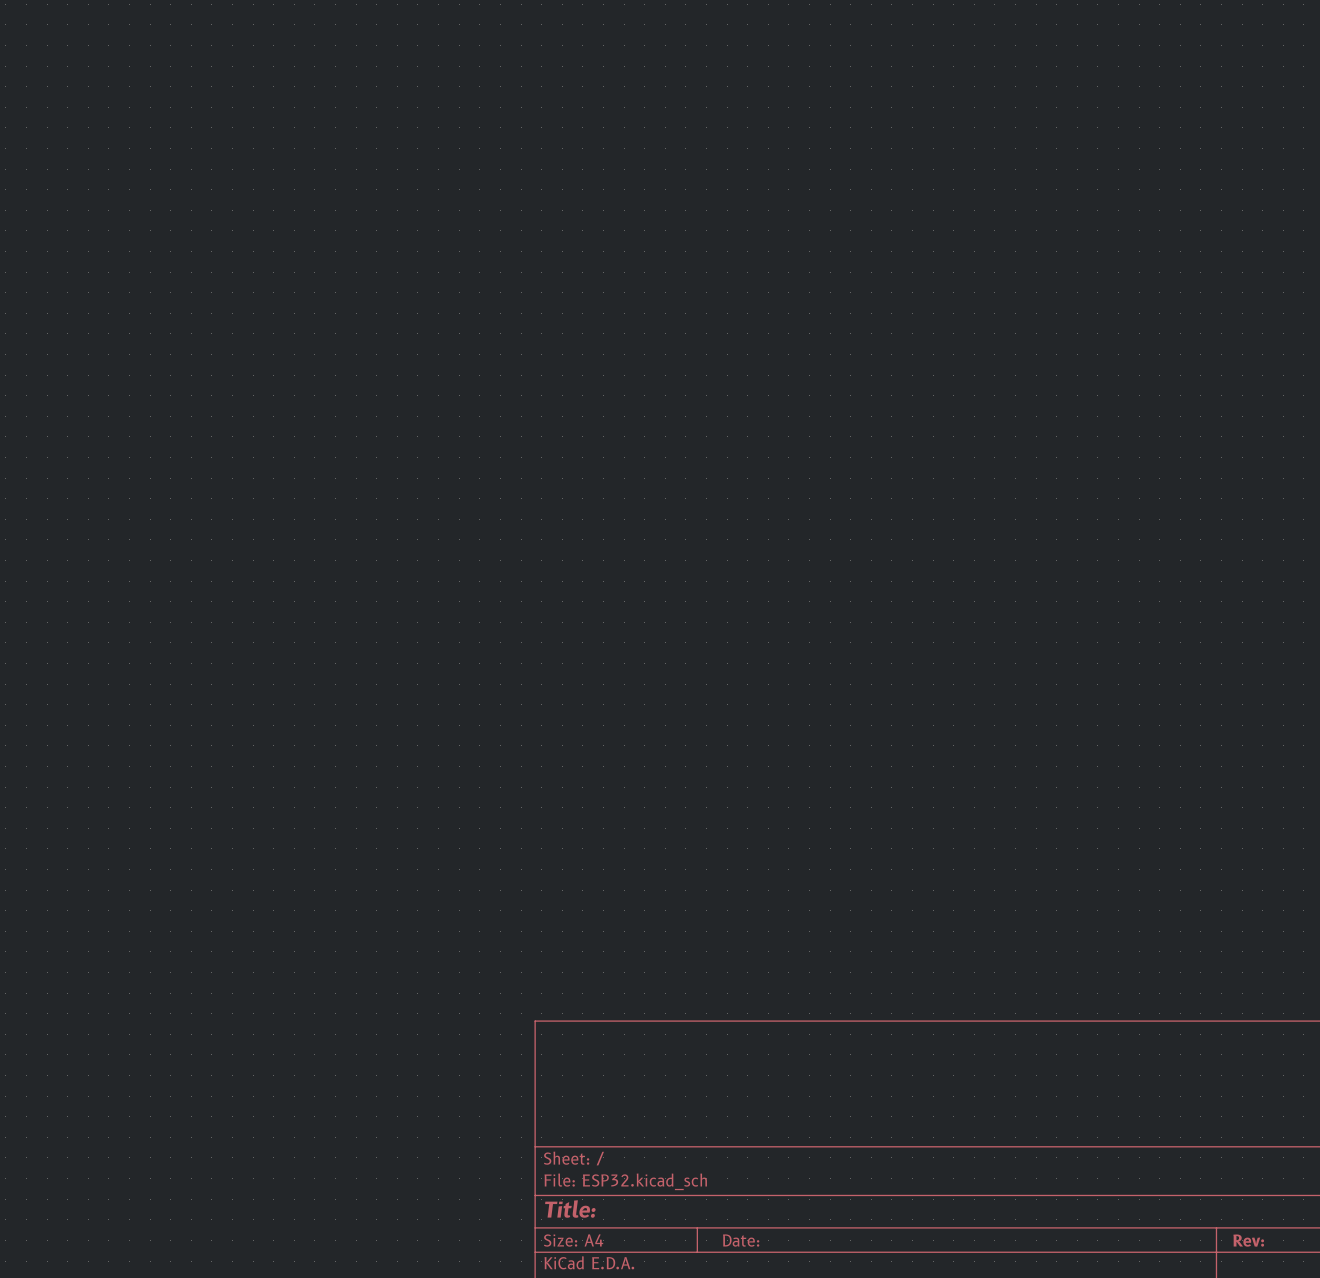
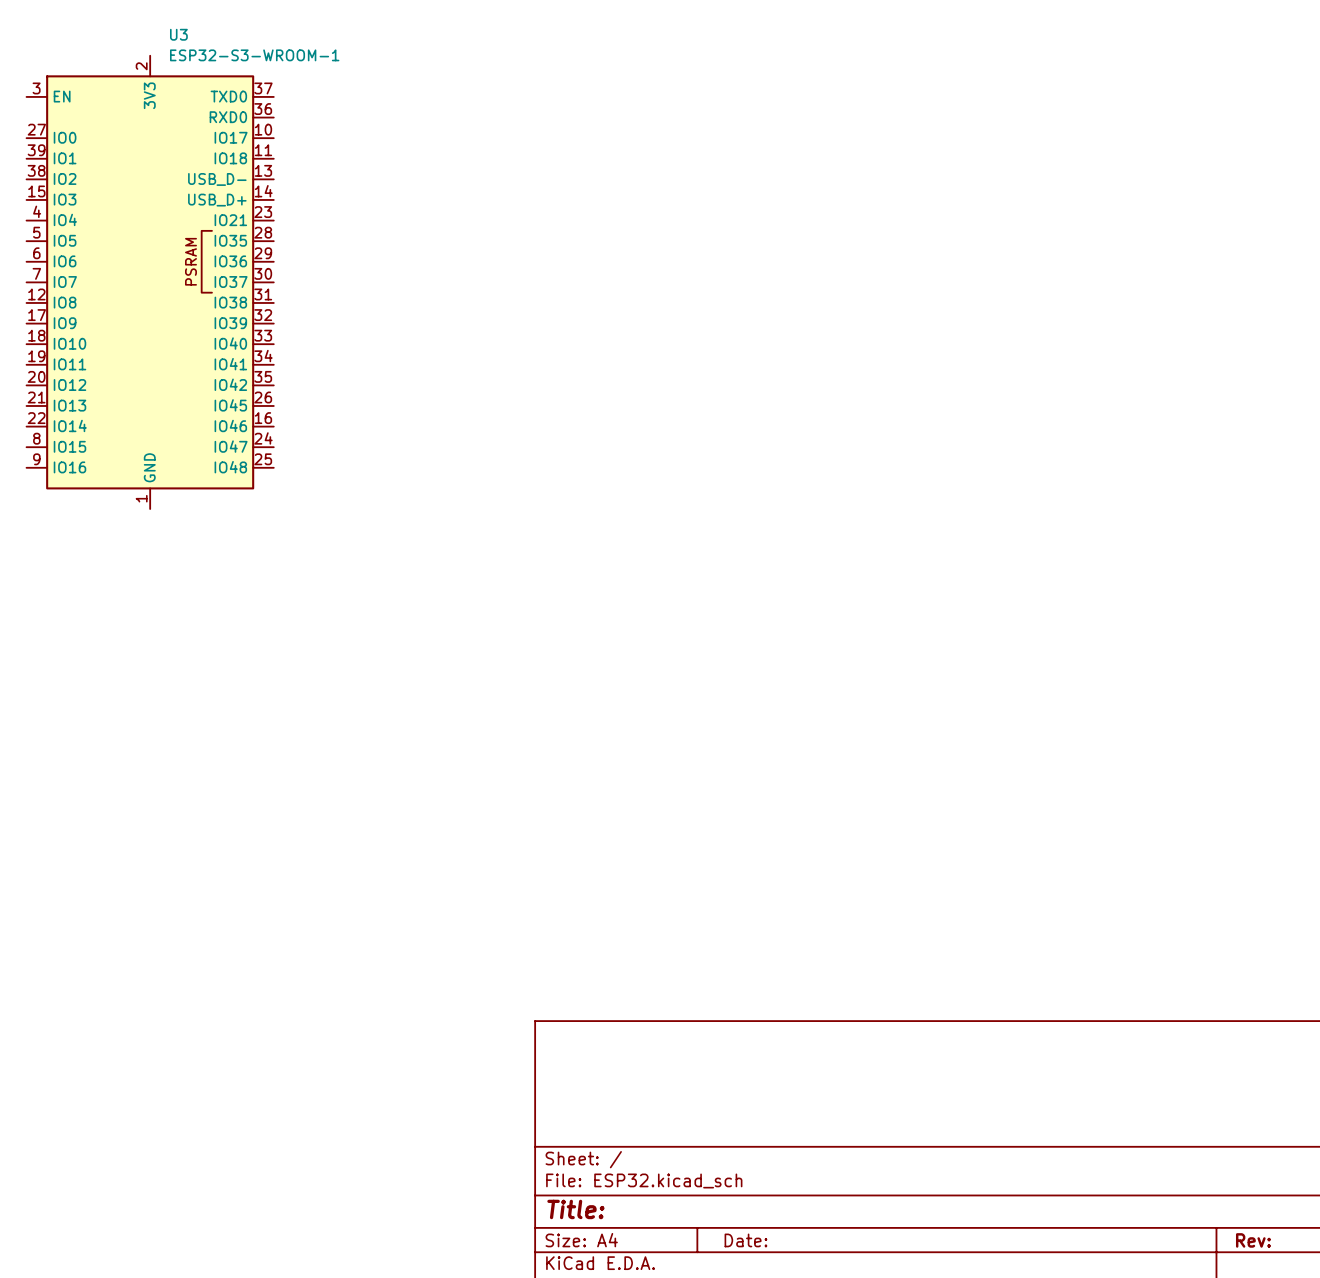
U3: none -> ESP32-S3-WROOM-1 (150, 282)

